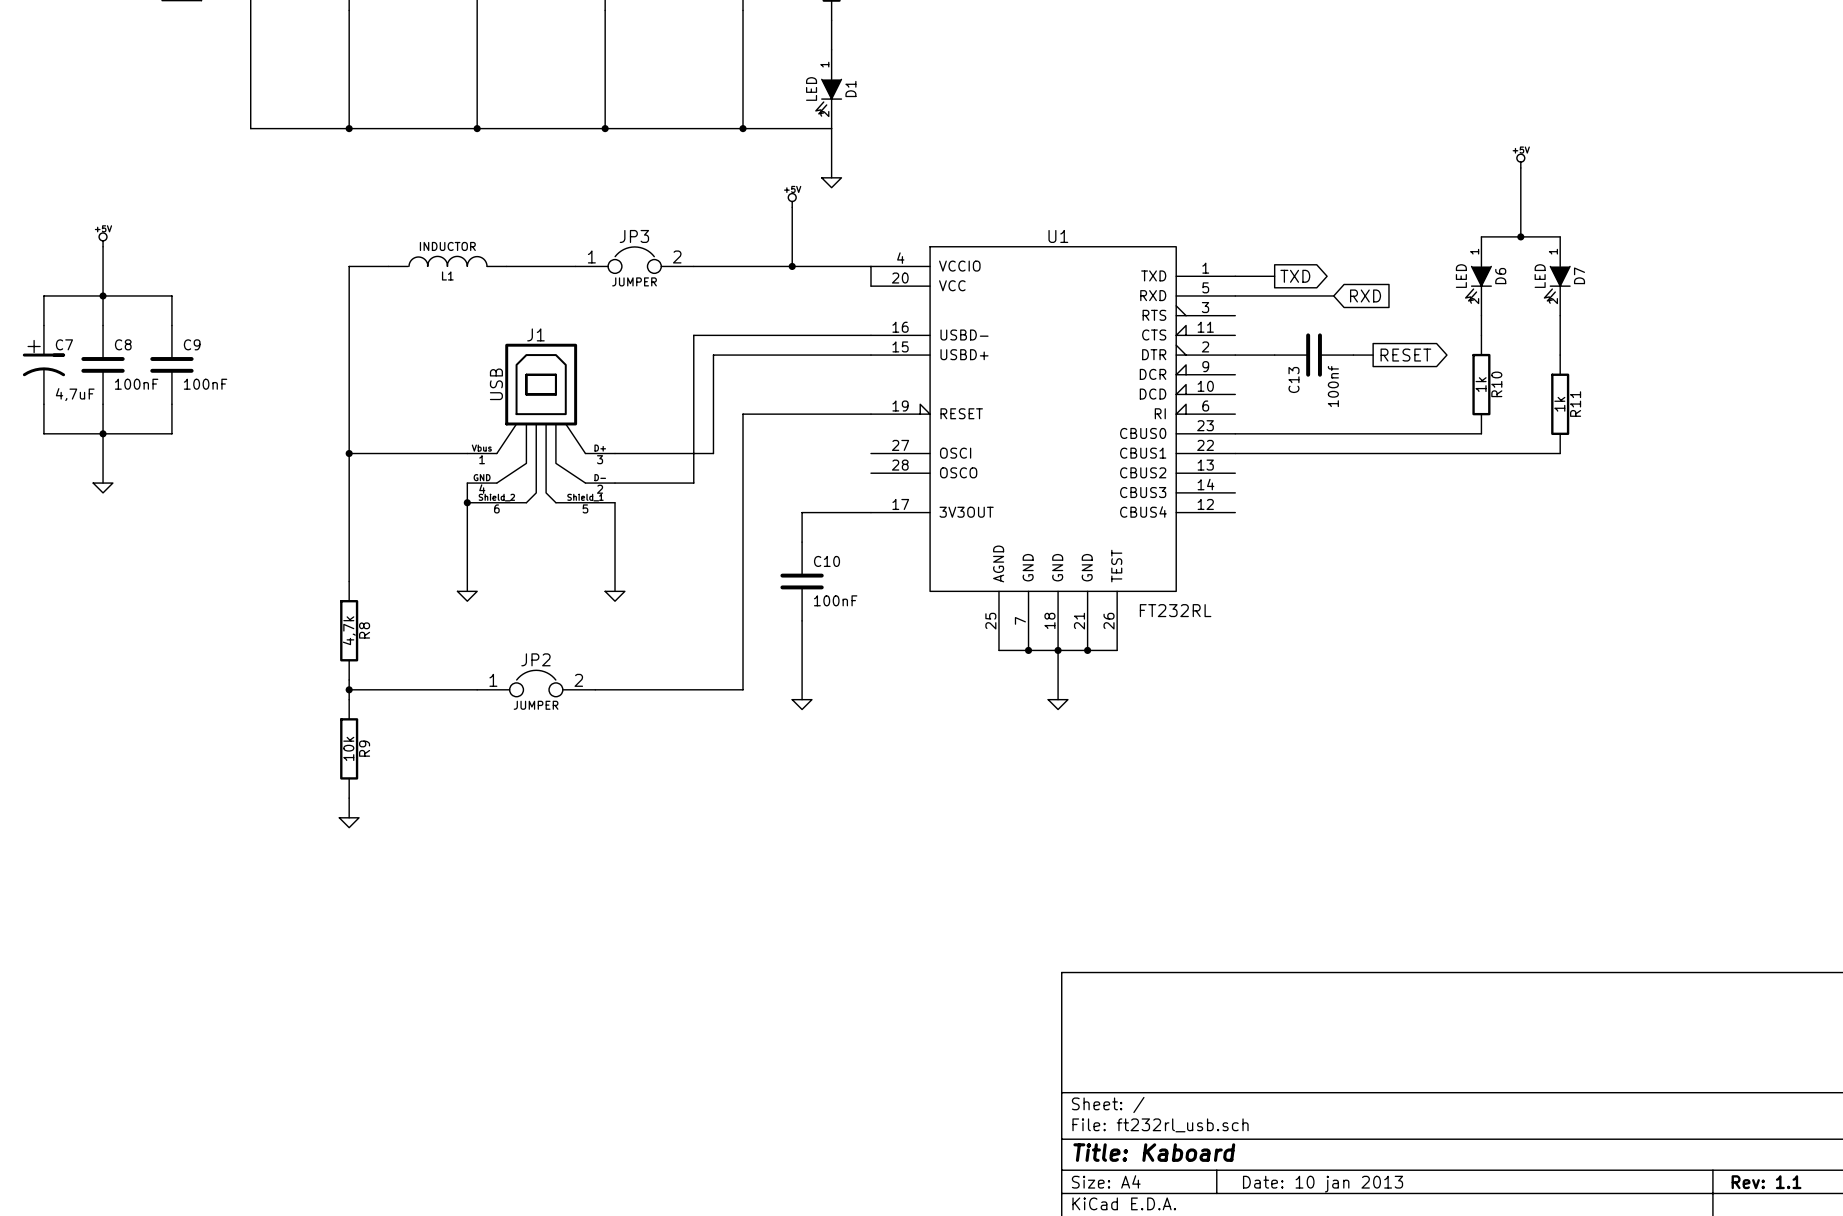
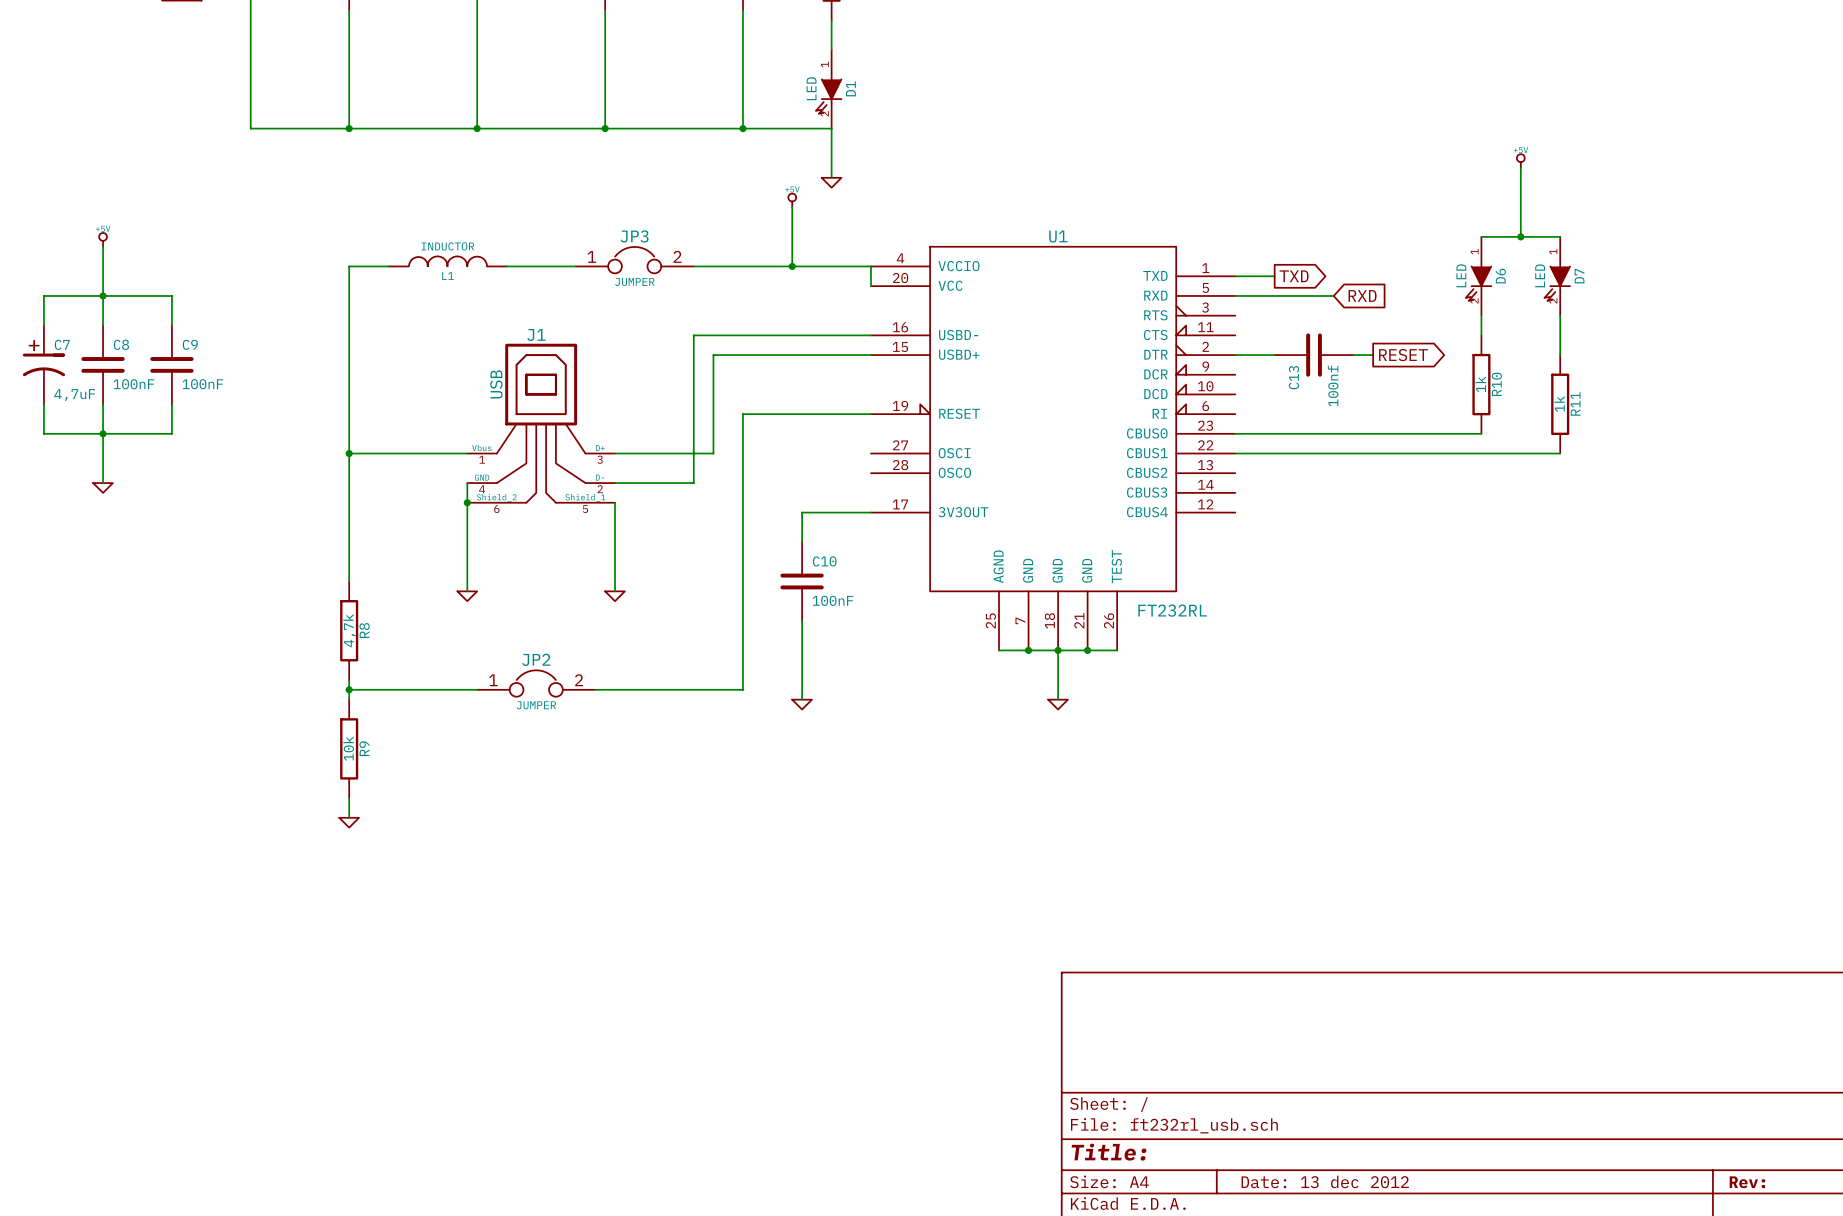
title block: Title: Kaboard (1154, 1152) -> Title: (1109, 1152)
title block: Rev: 1.1 (1766, 1182) -> Rev: (1747, 1182)
title block: Date: 10 jan 2013 (1323, 1184) -> Date: 13 dec 2012 (1325, 1181)

